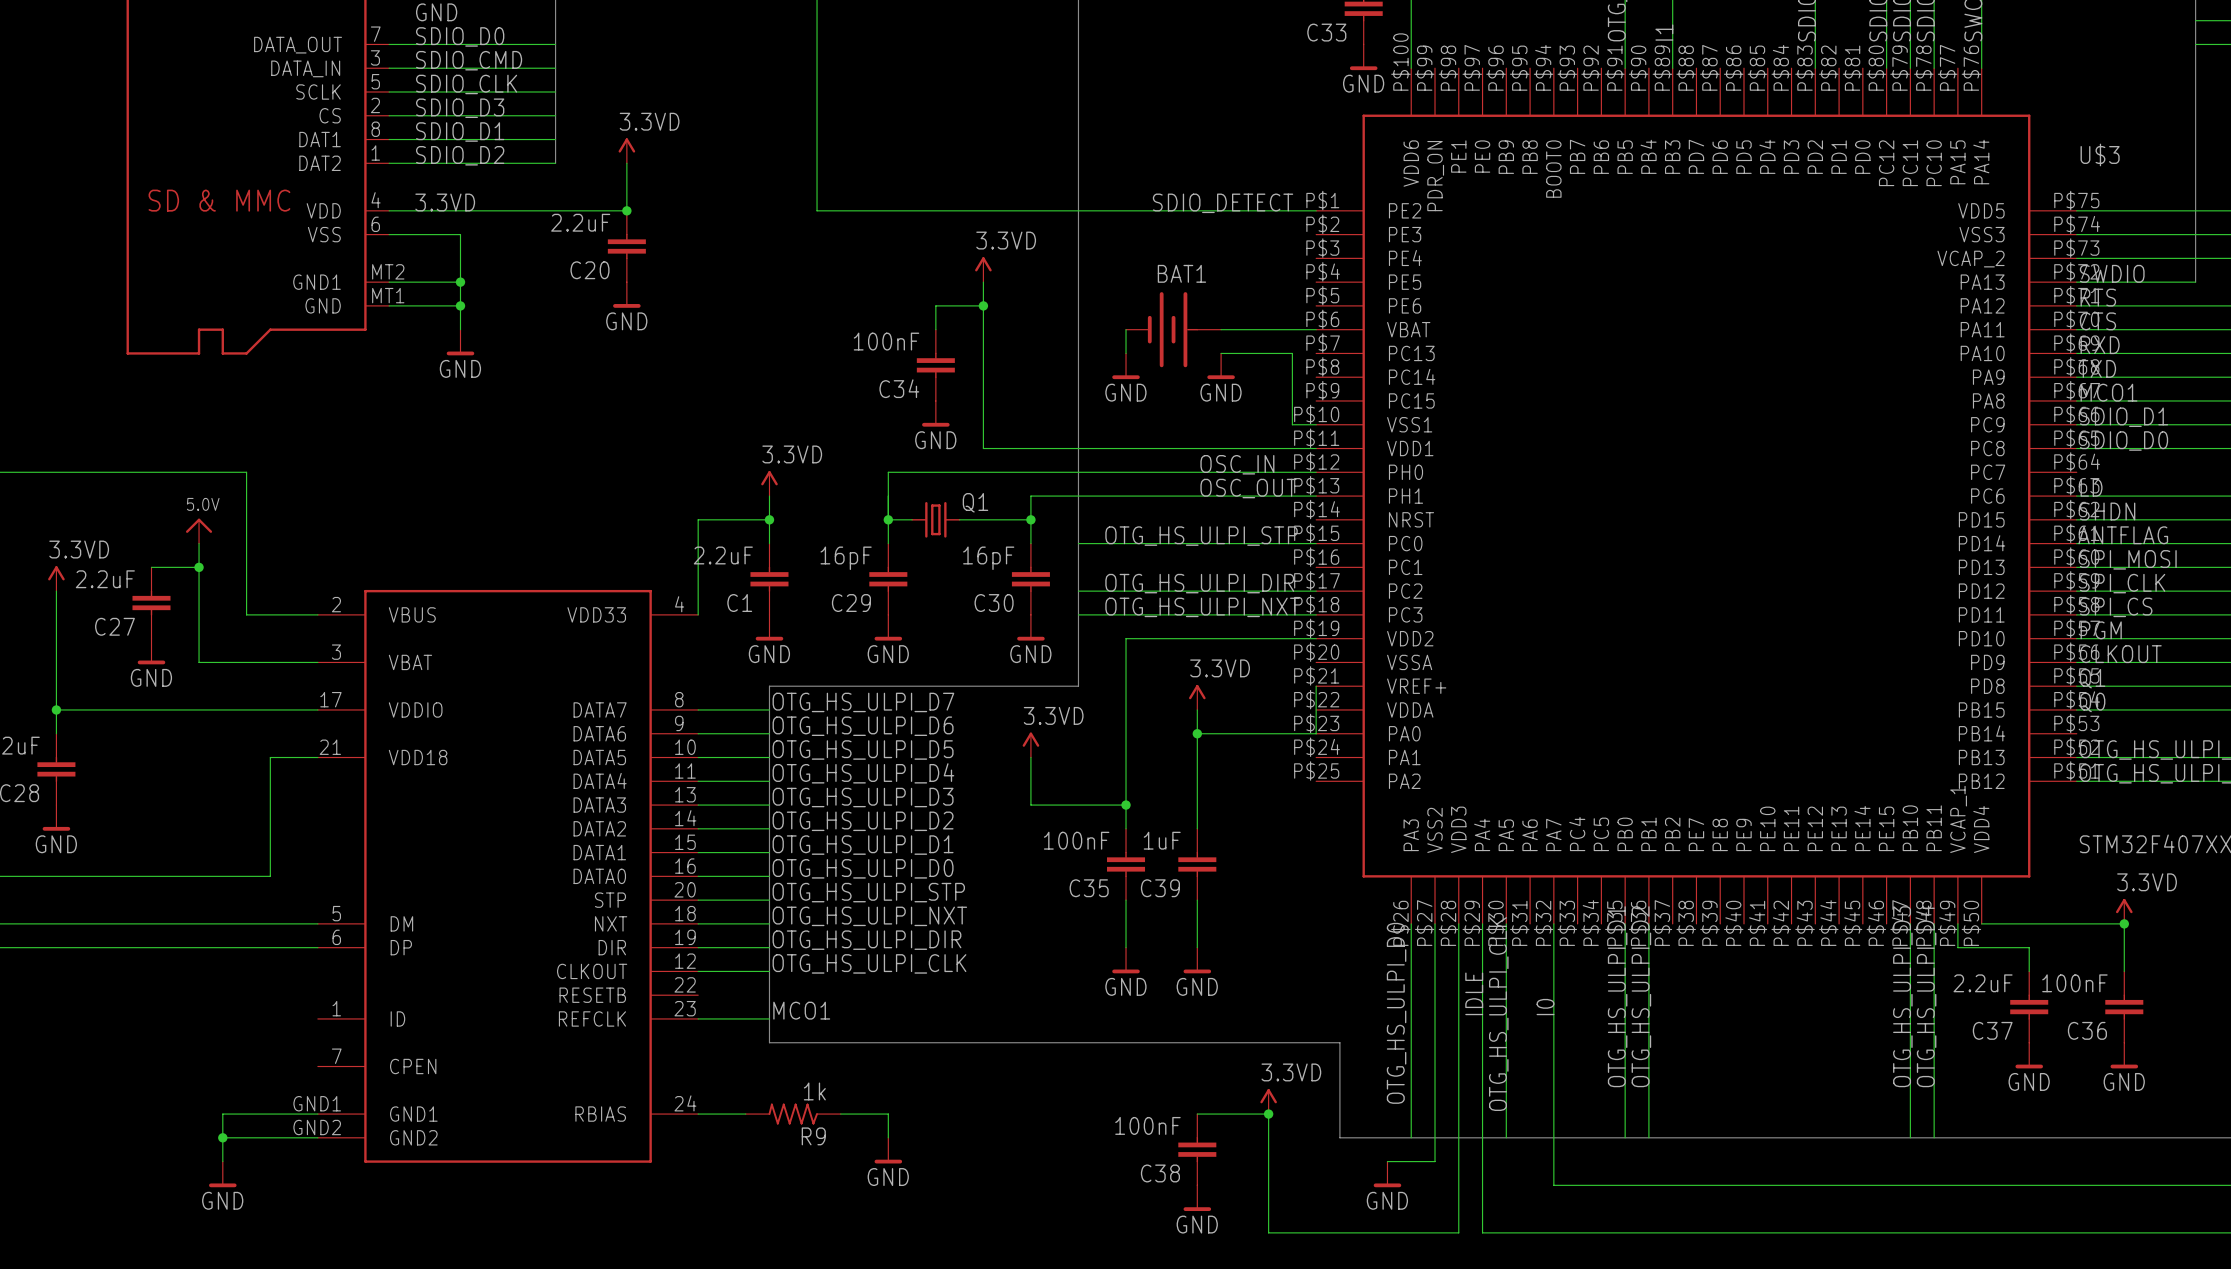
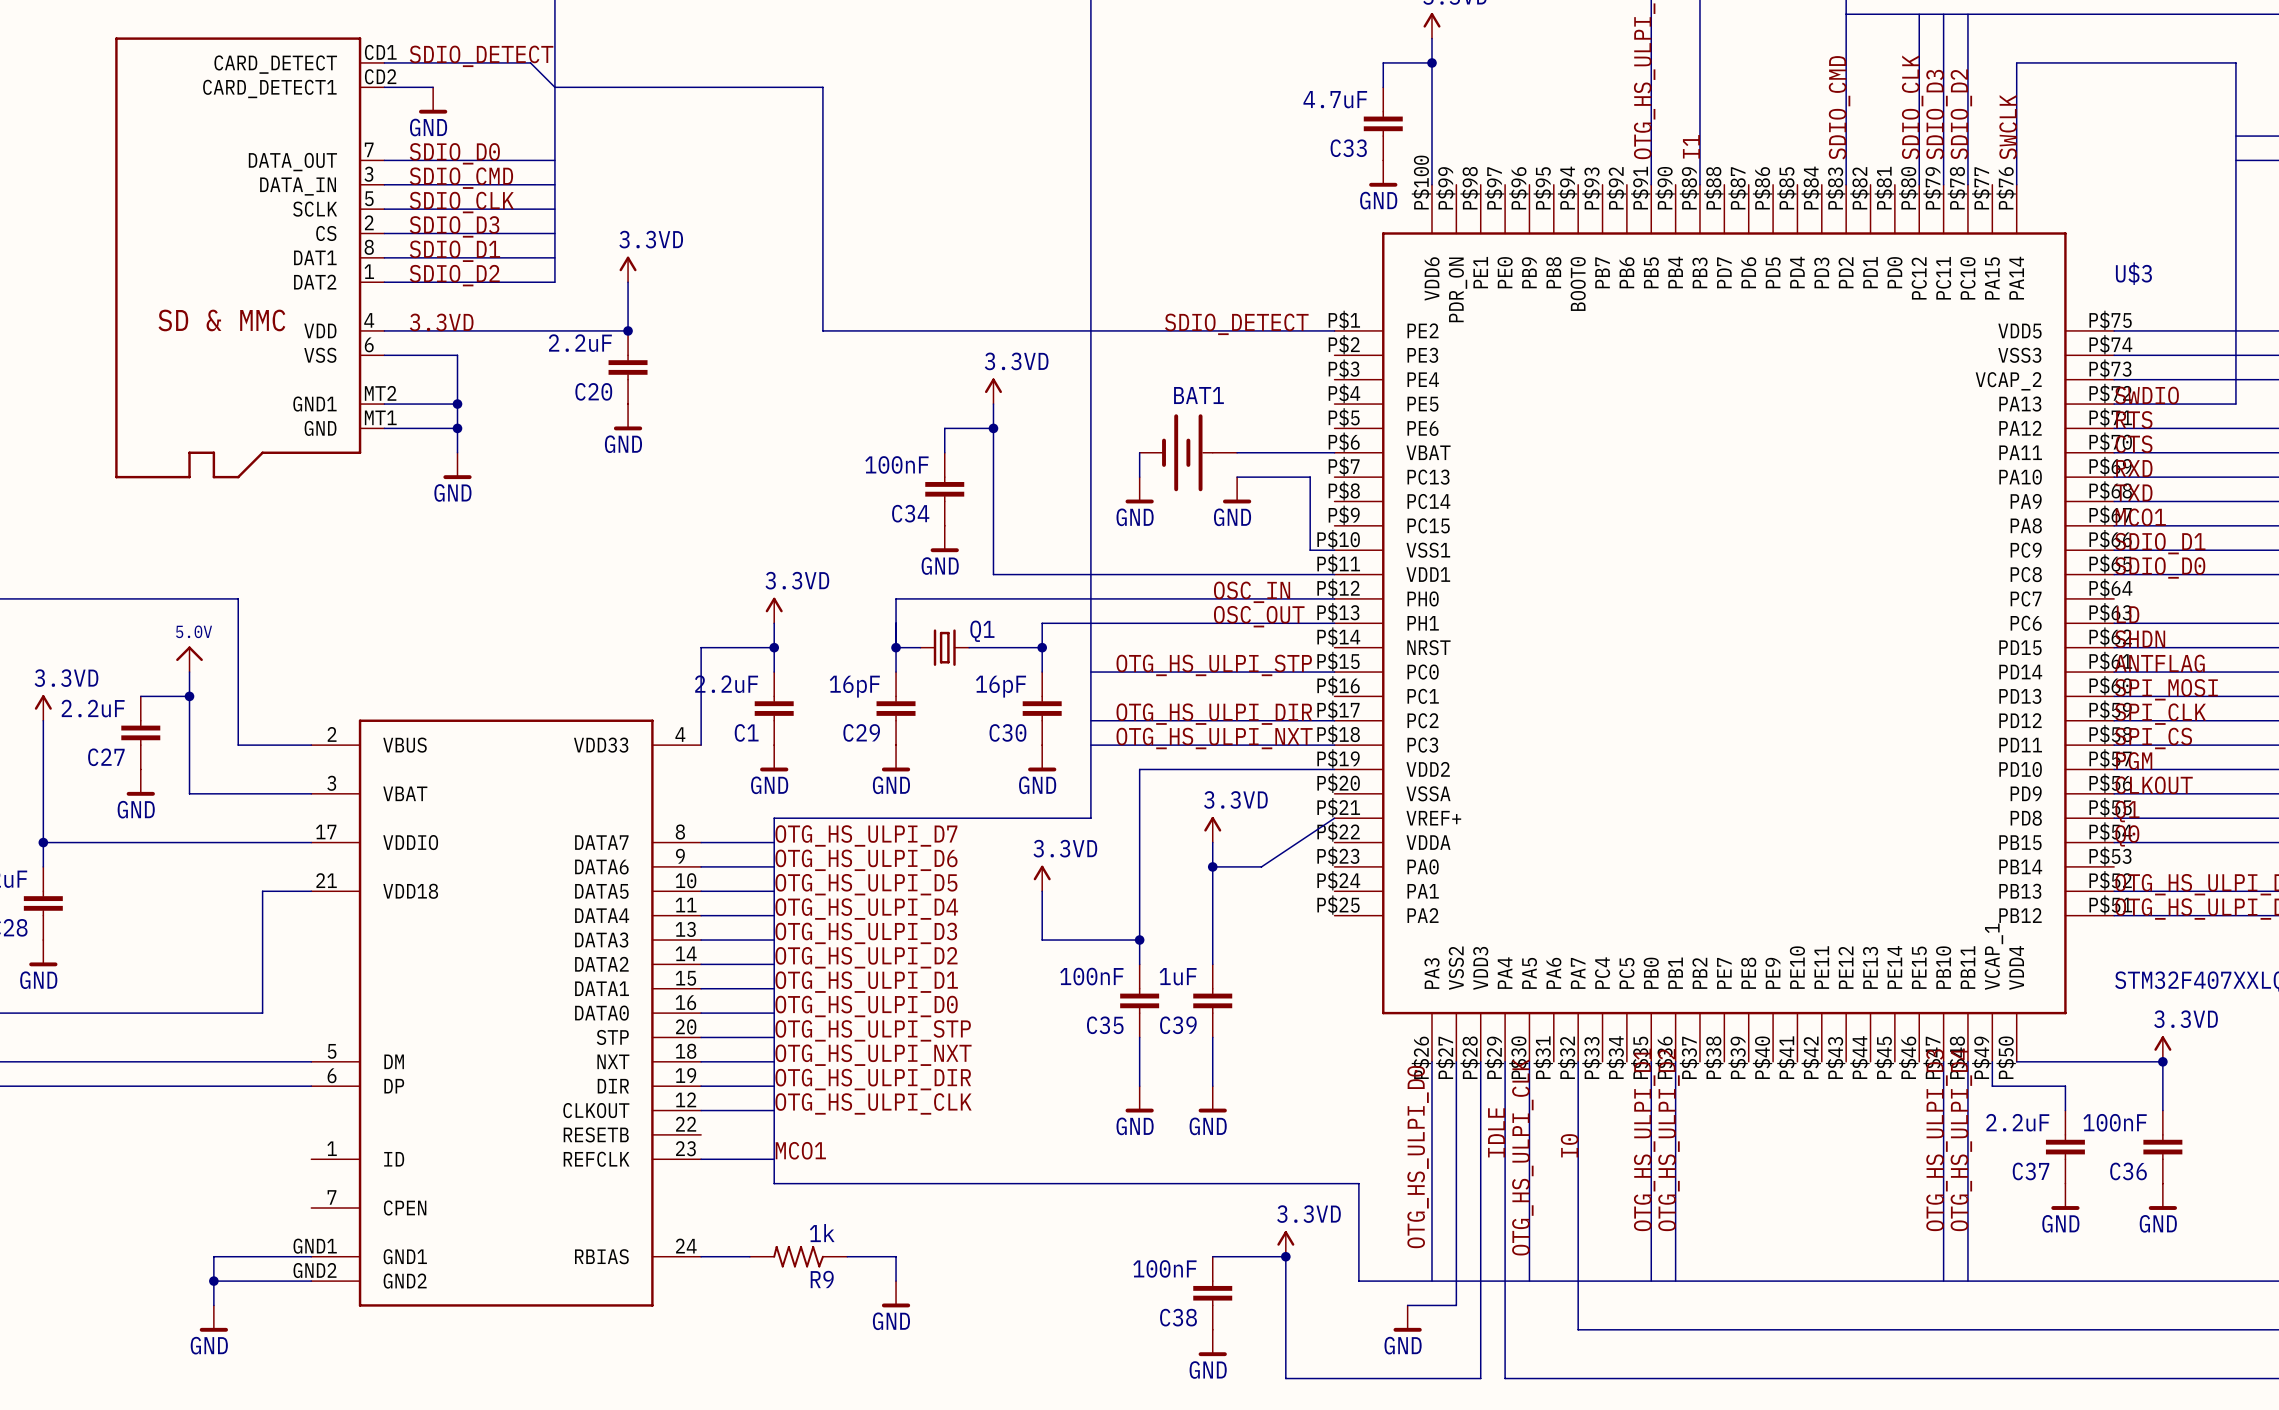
wire: (1316, 686) (1316, 733) (1244, 733) -> (1334, 818) (1261, 866)

